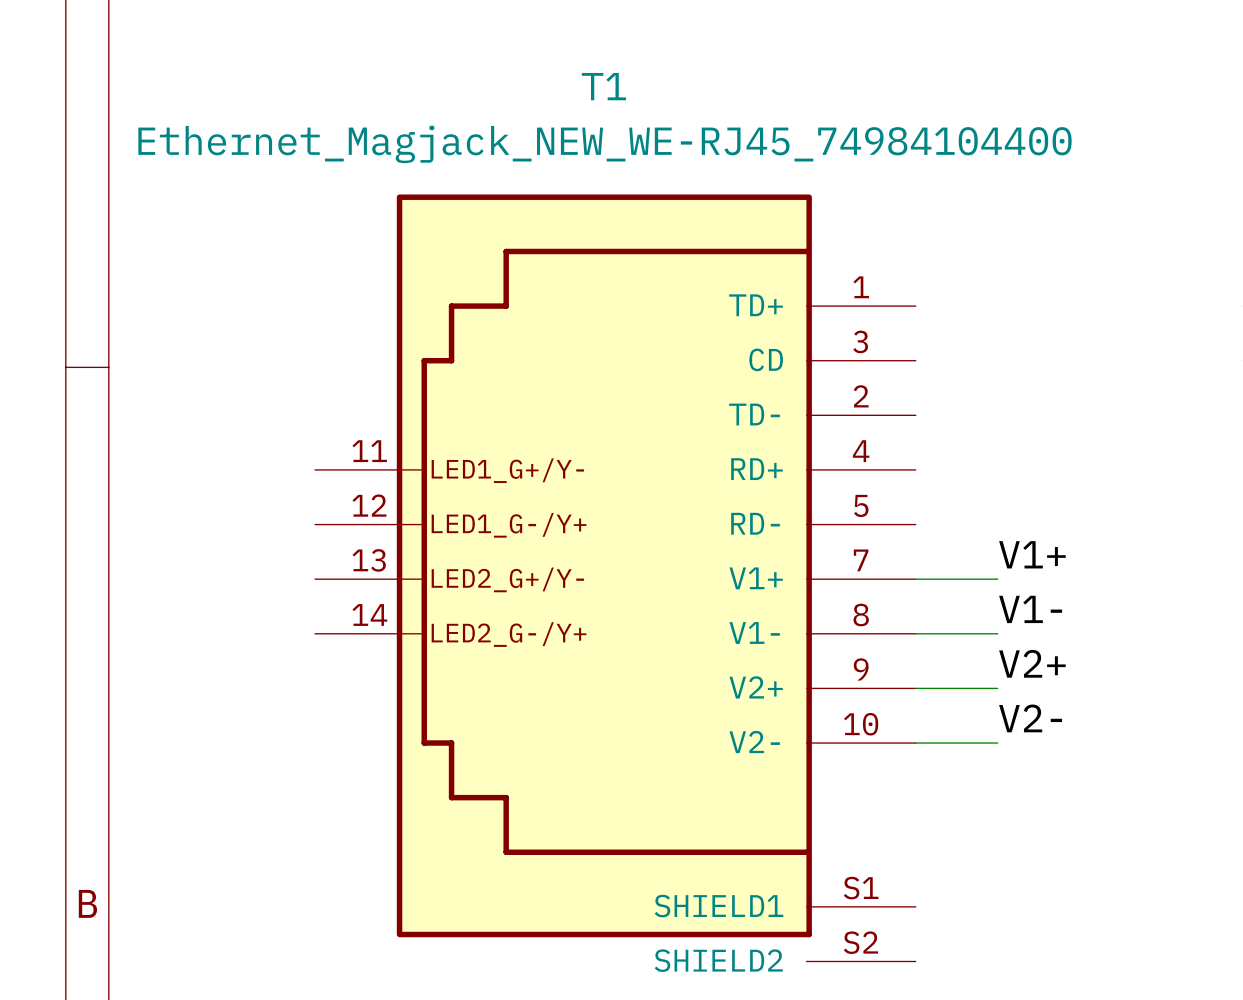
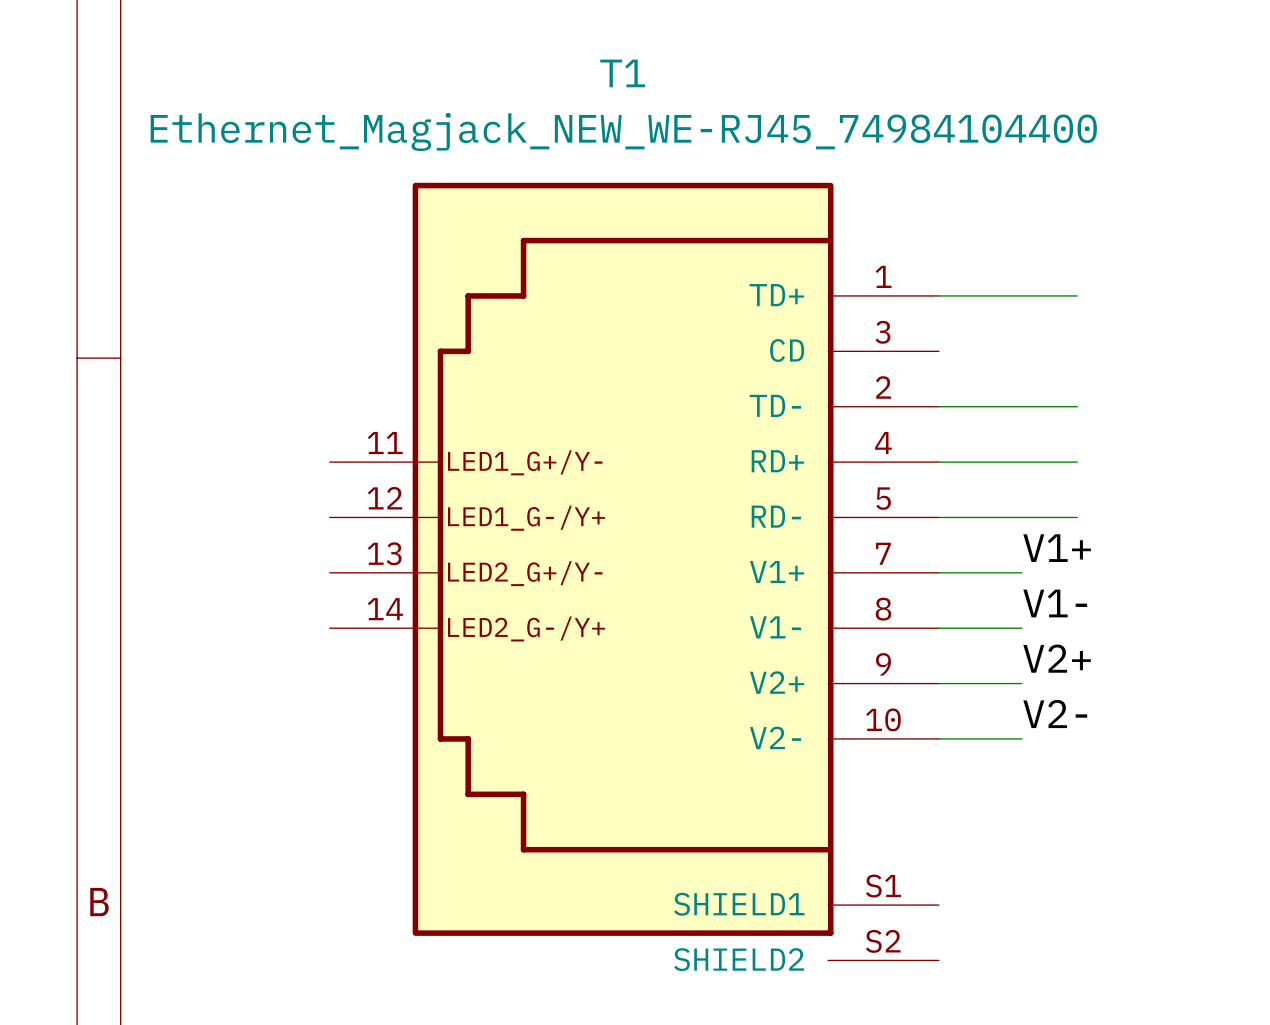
wire: none -> (938, 295) (1077, 295)
wire: none -> (938, 406) (1077, 406)
wire: none -> (938, 462) (1077, 462)
wire: none -> (938, 517) (1077, 517)

